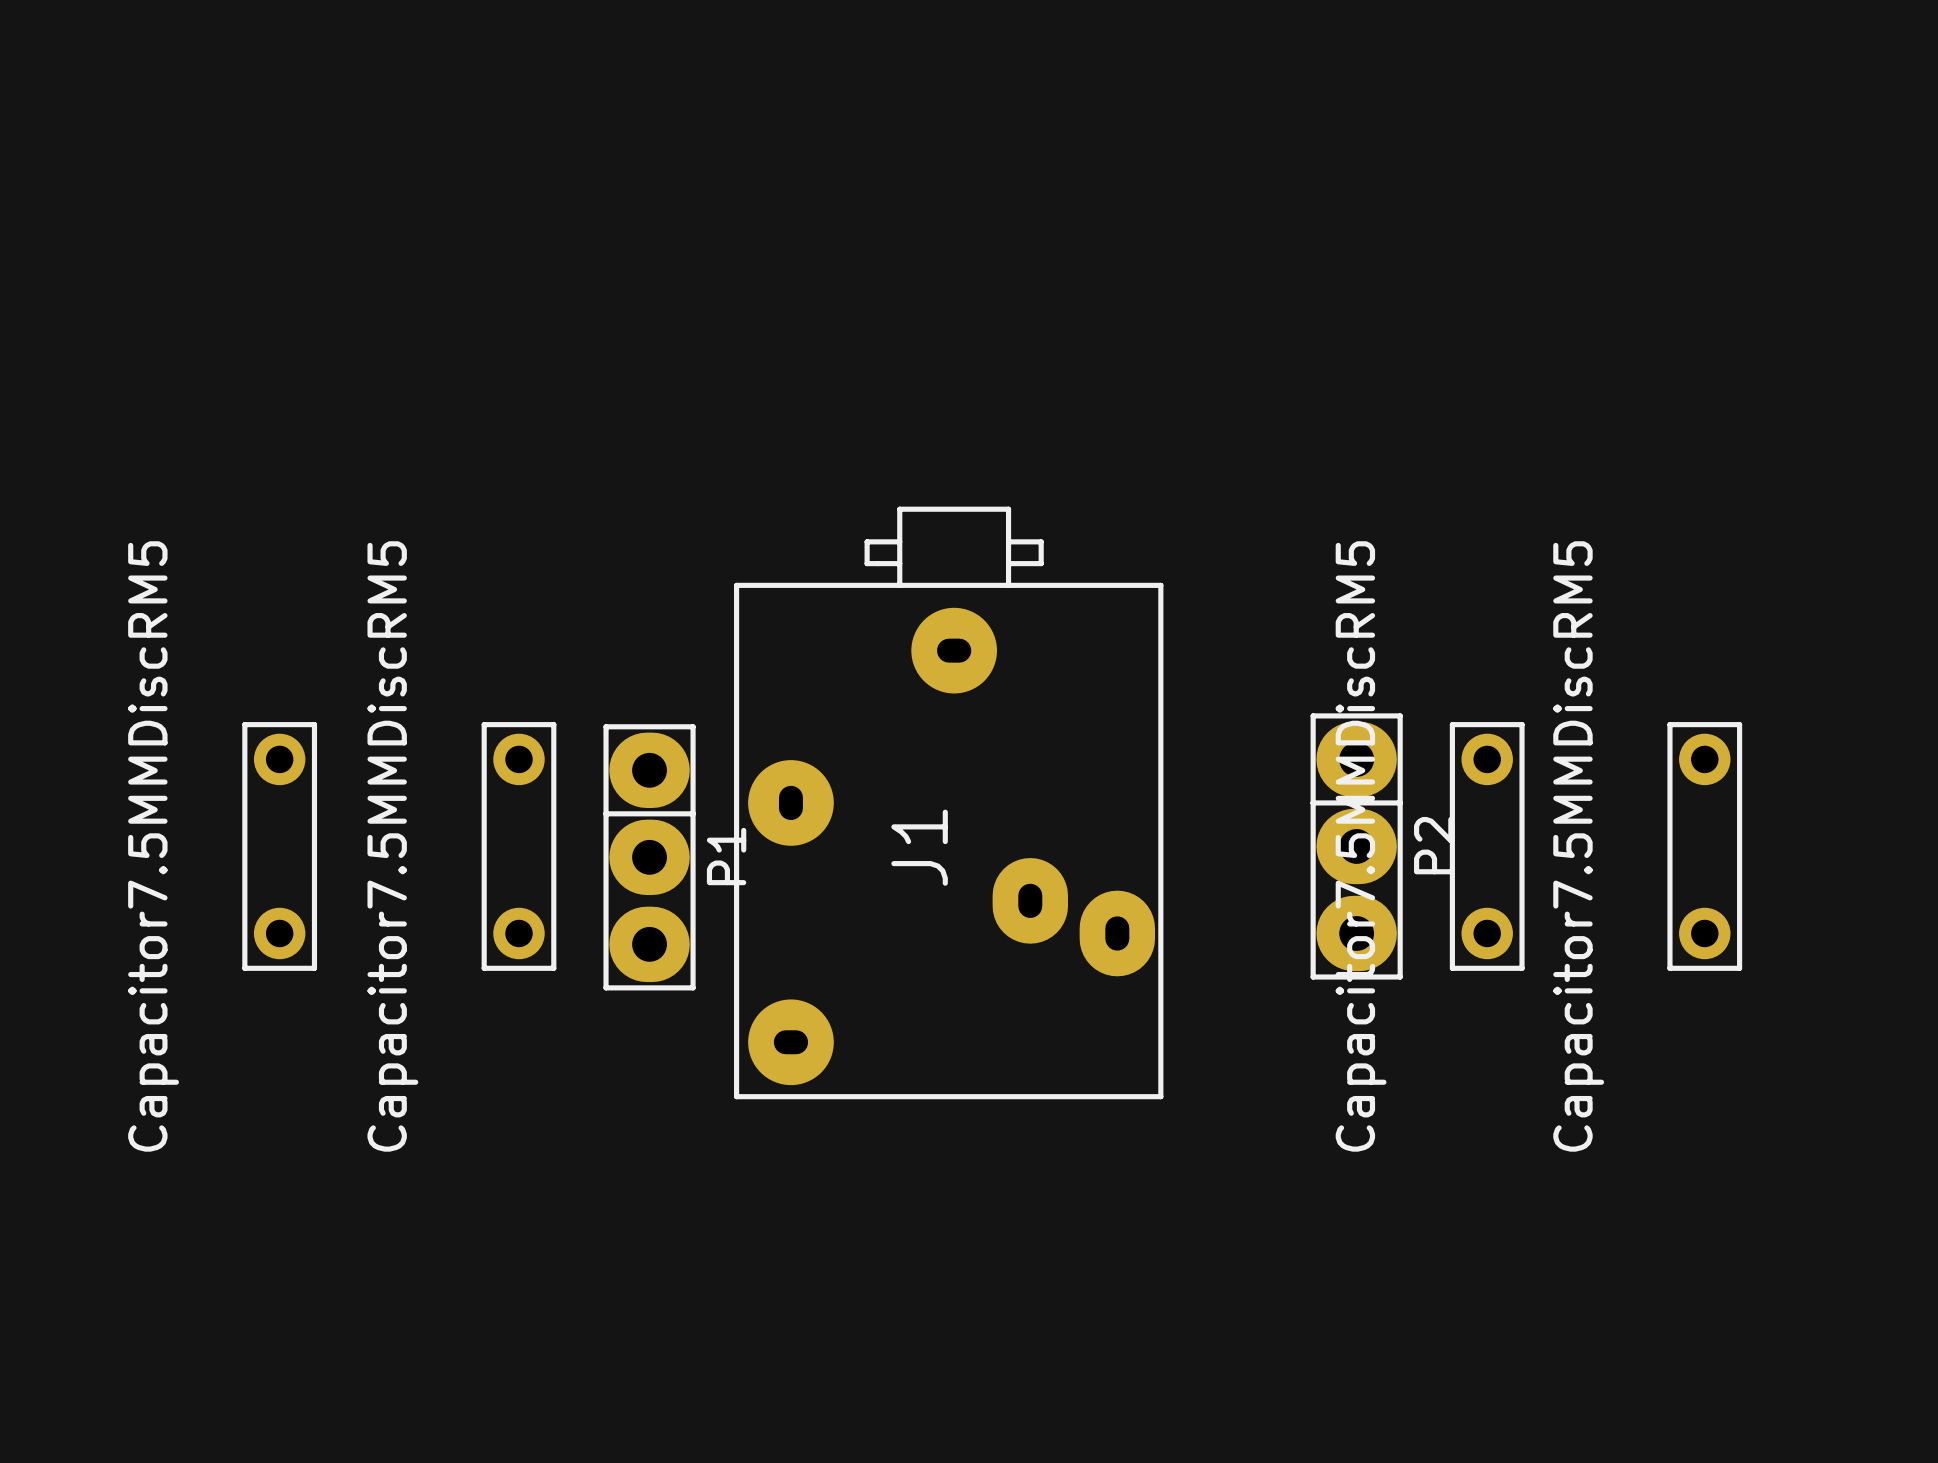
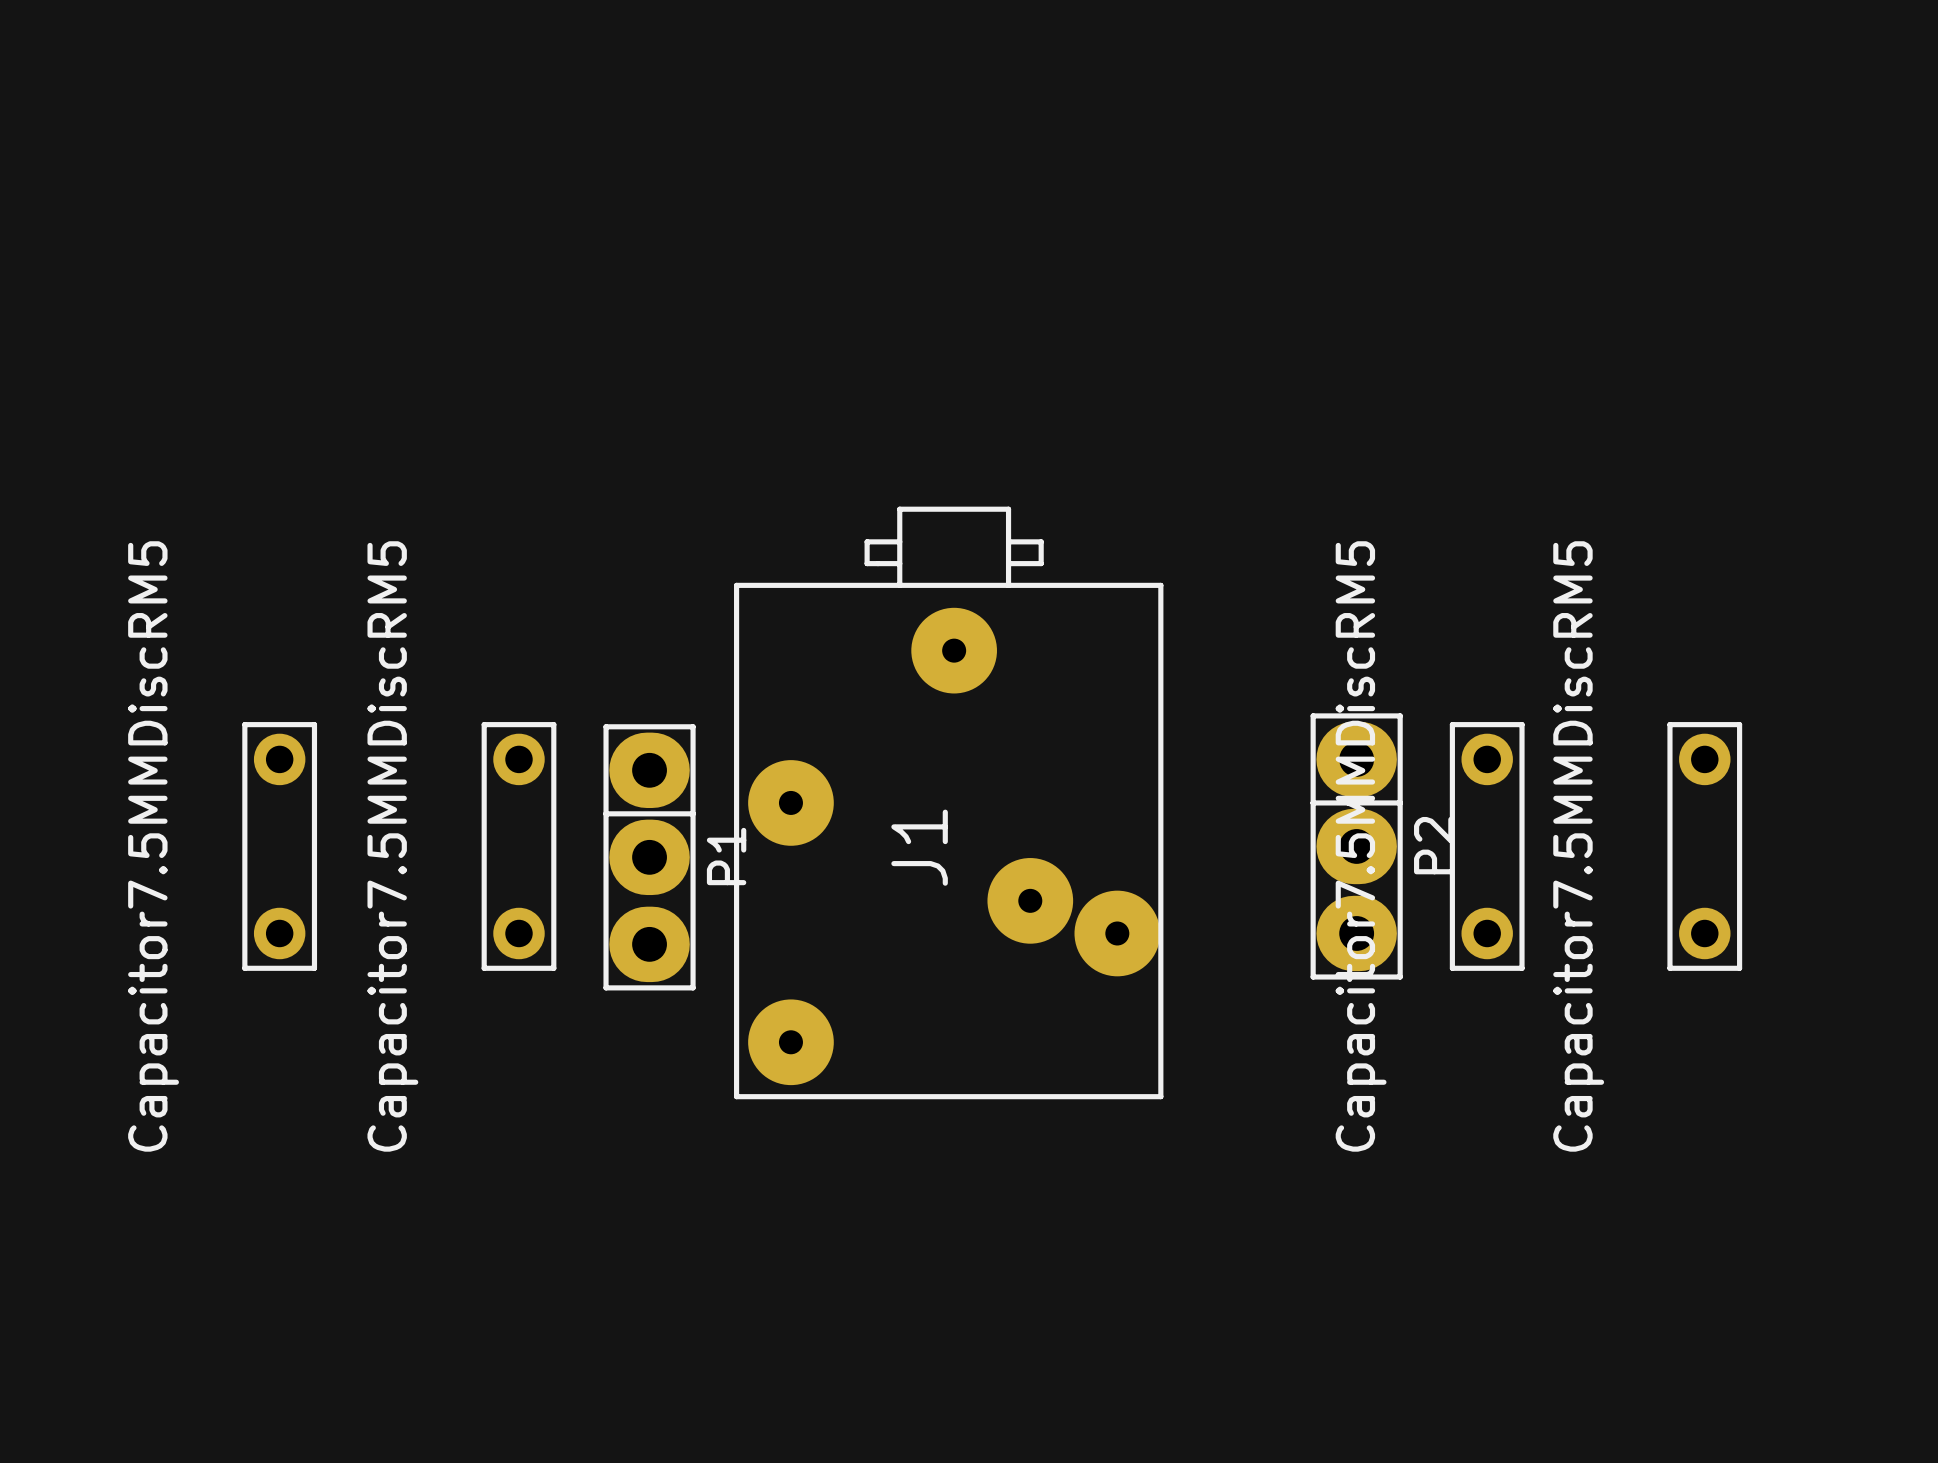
J1 footprint: [734, 506, 1164, 1100] -> [734, 506, 1164, 1100]

